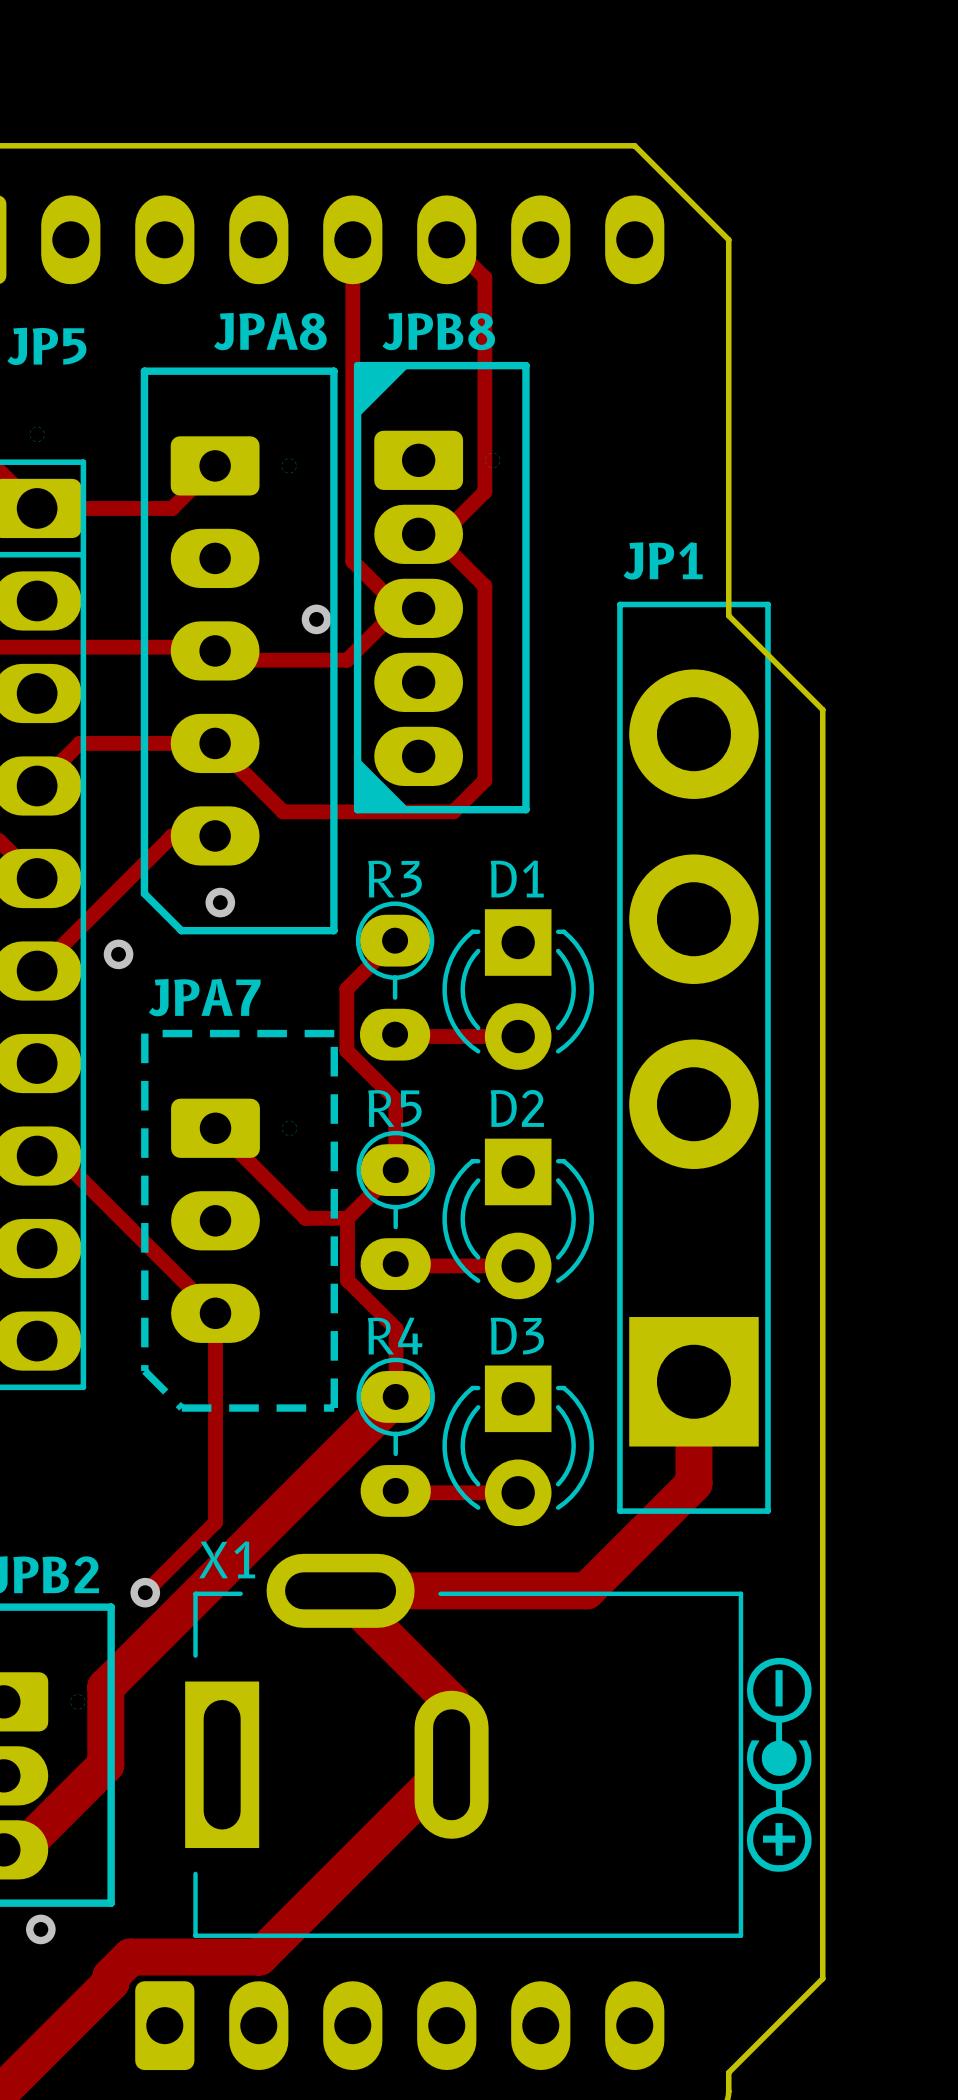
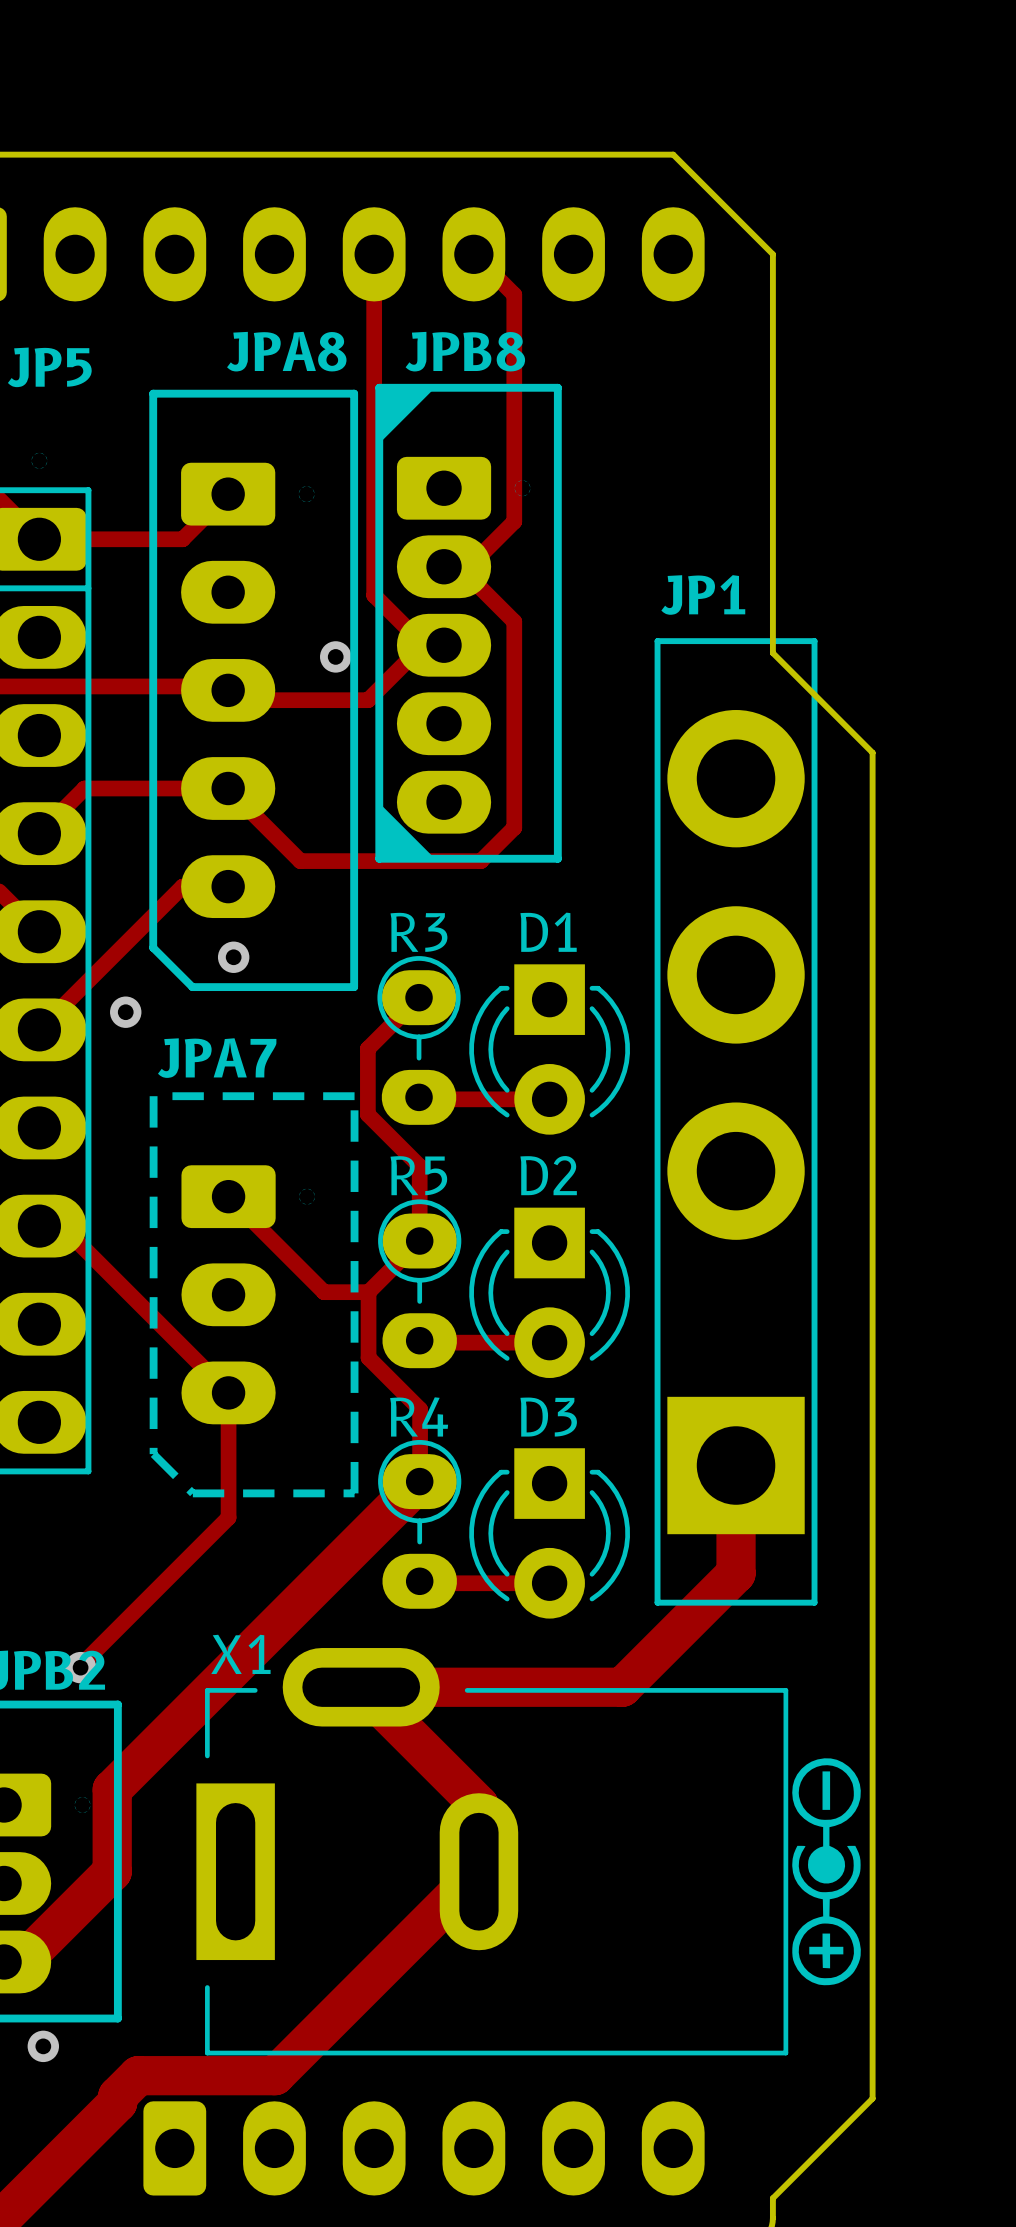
track: (215, 1430) (215, 1522) (145, 1592) -> (228, 1517) (80, 1667)
via position: (145, 1592) -> (80, 1667)

